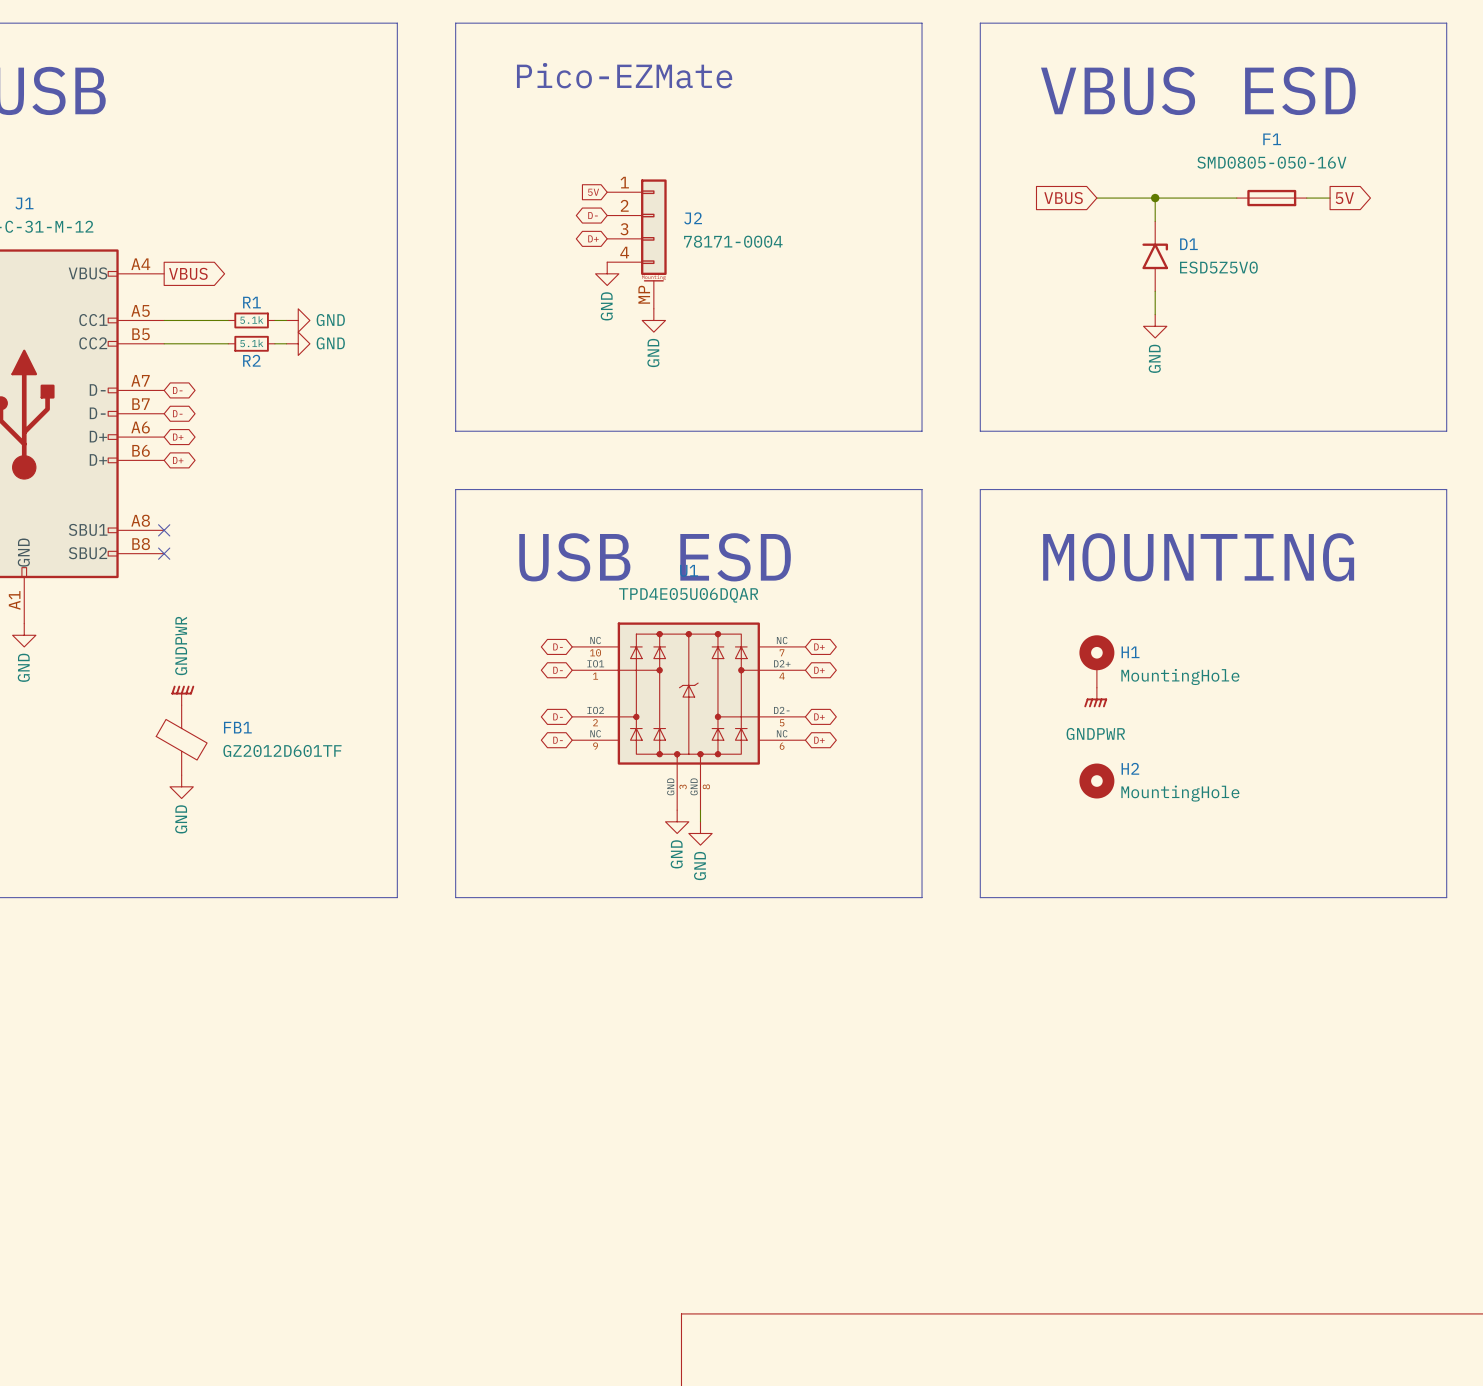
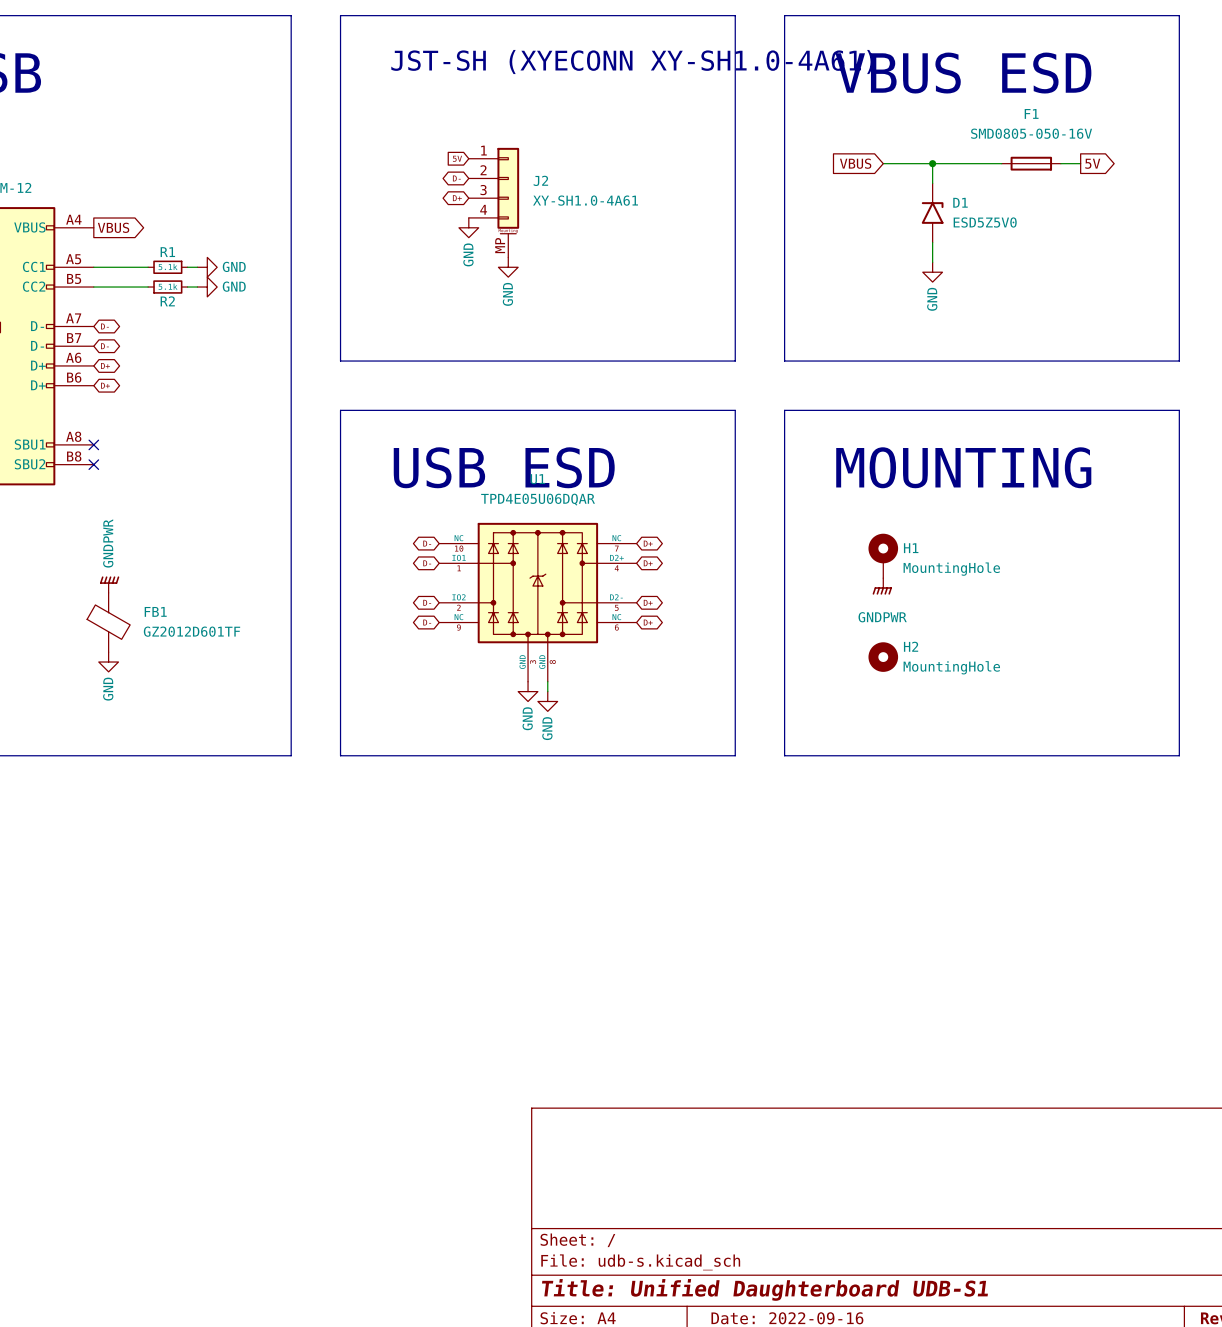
text: Pico-EZMate (624, 75) -> JST-SH (XYECONN XY-SH1.0-4A61) (632, 62)
J2 value: 78171-0004 (733, 241) -> XY-SH1.0-4A61 (585, 200)

